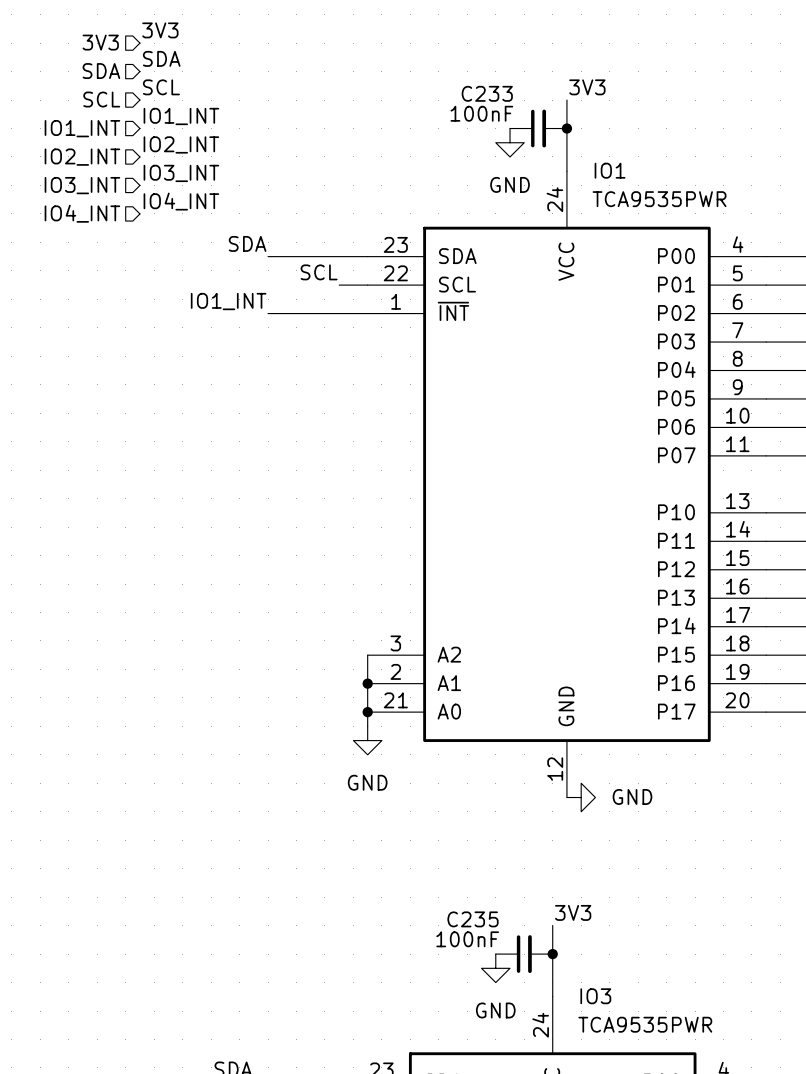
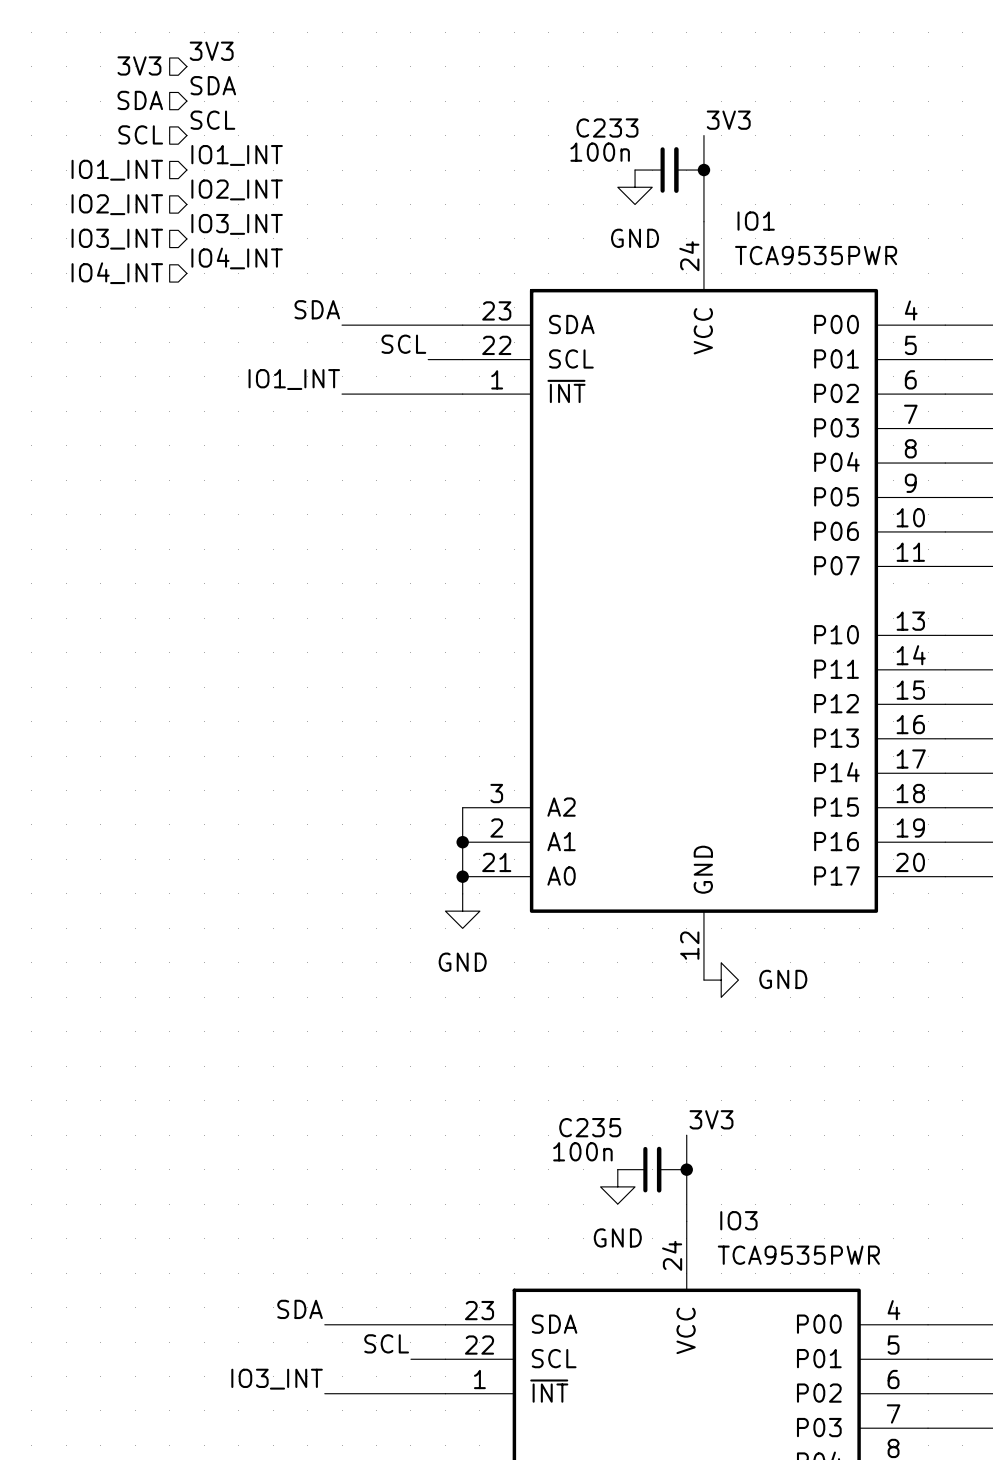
C233 value: 100nF (481, 113) -> 100n (600, 152)
C235 value: 100nF (467, 939) -> 100n (582, 1151)

